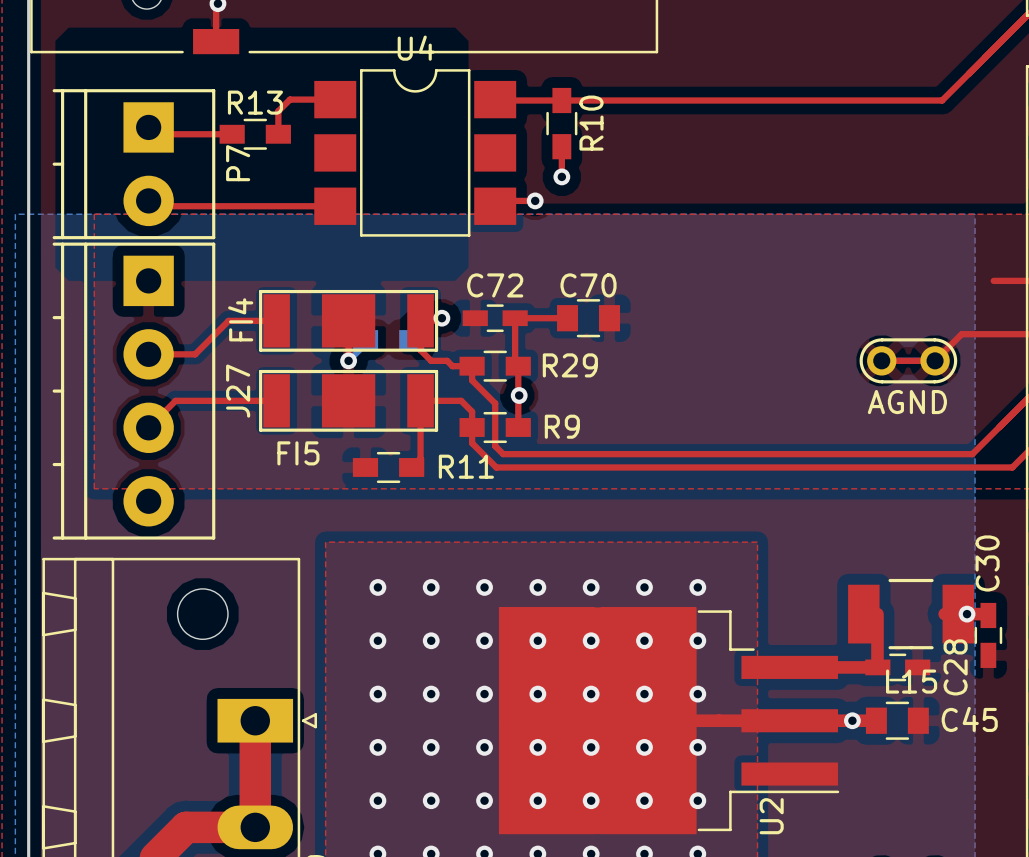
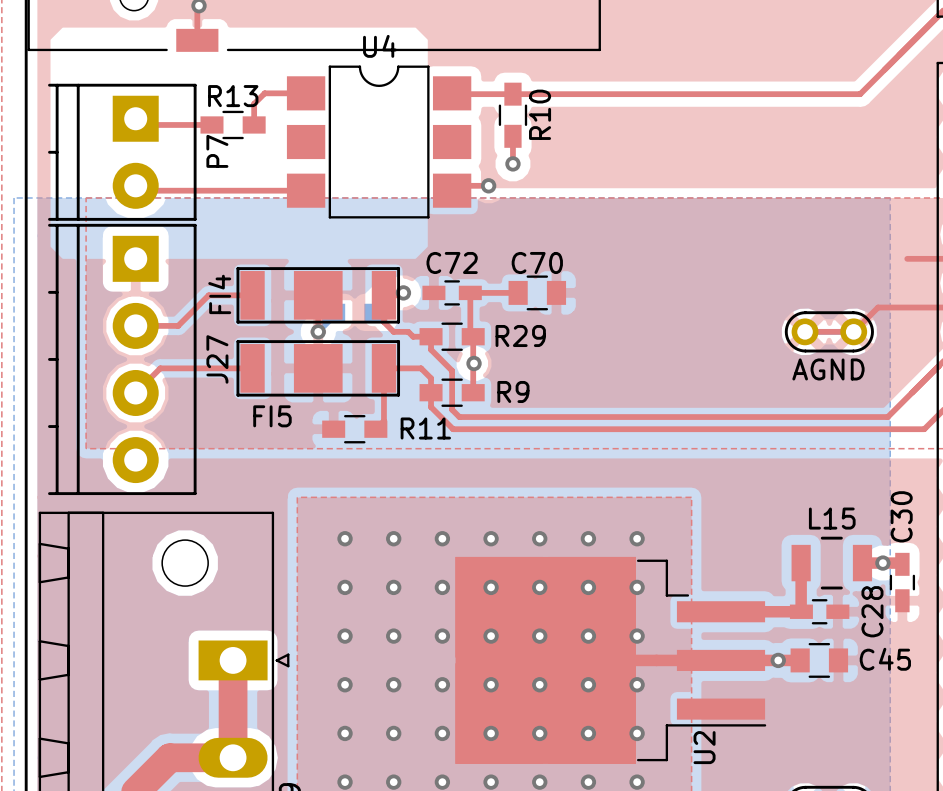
L15 footprint: [848, 578, 975, 650] -> [791, 536, 873, 590]
L15 name position: L15 (911, 681) -> L15 (832, 518)

